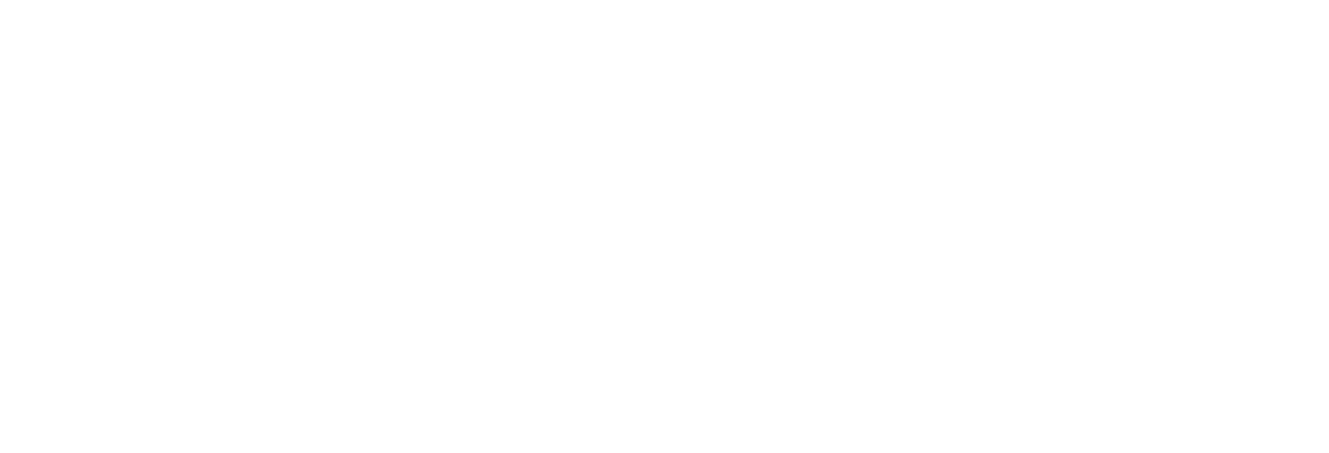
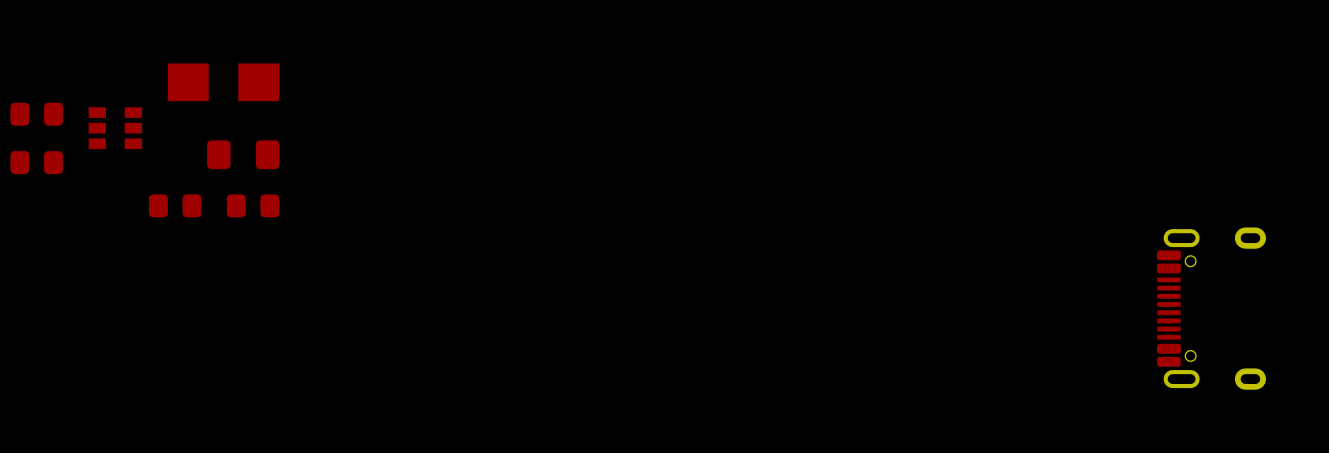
part: none -> (223, 82)
part: none -> (36, 114)
part: none -> (115, 128)
part: none -> (243, 154)
part: none -> (36, 162)
part: none -> (175, 205)
part: none -> (253, 205)
part: none -> (1211, 308)

